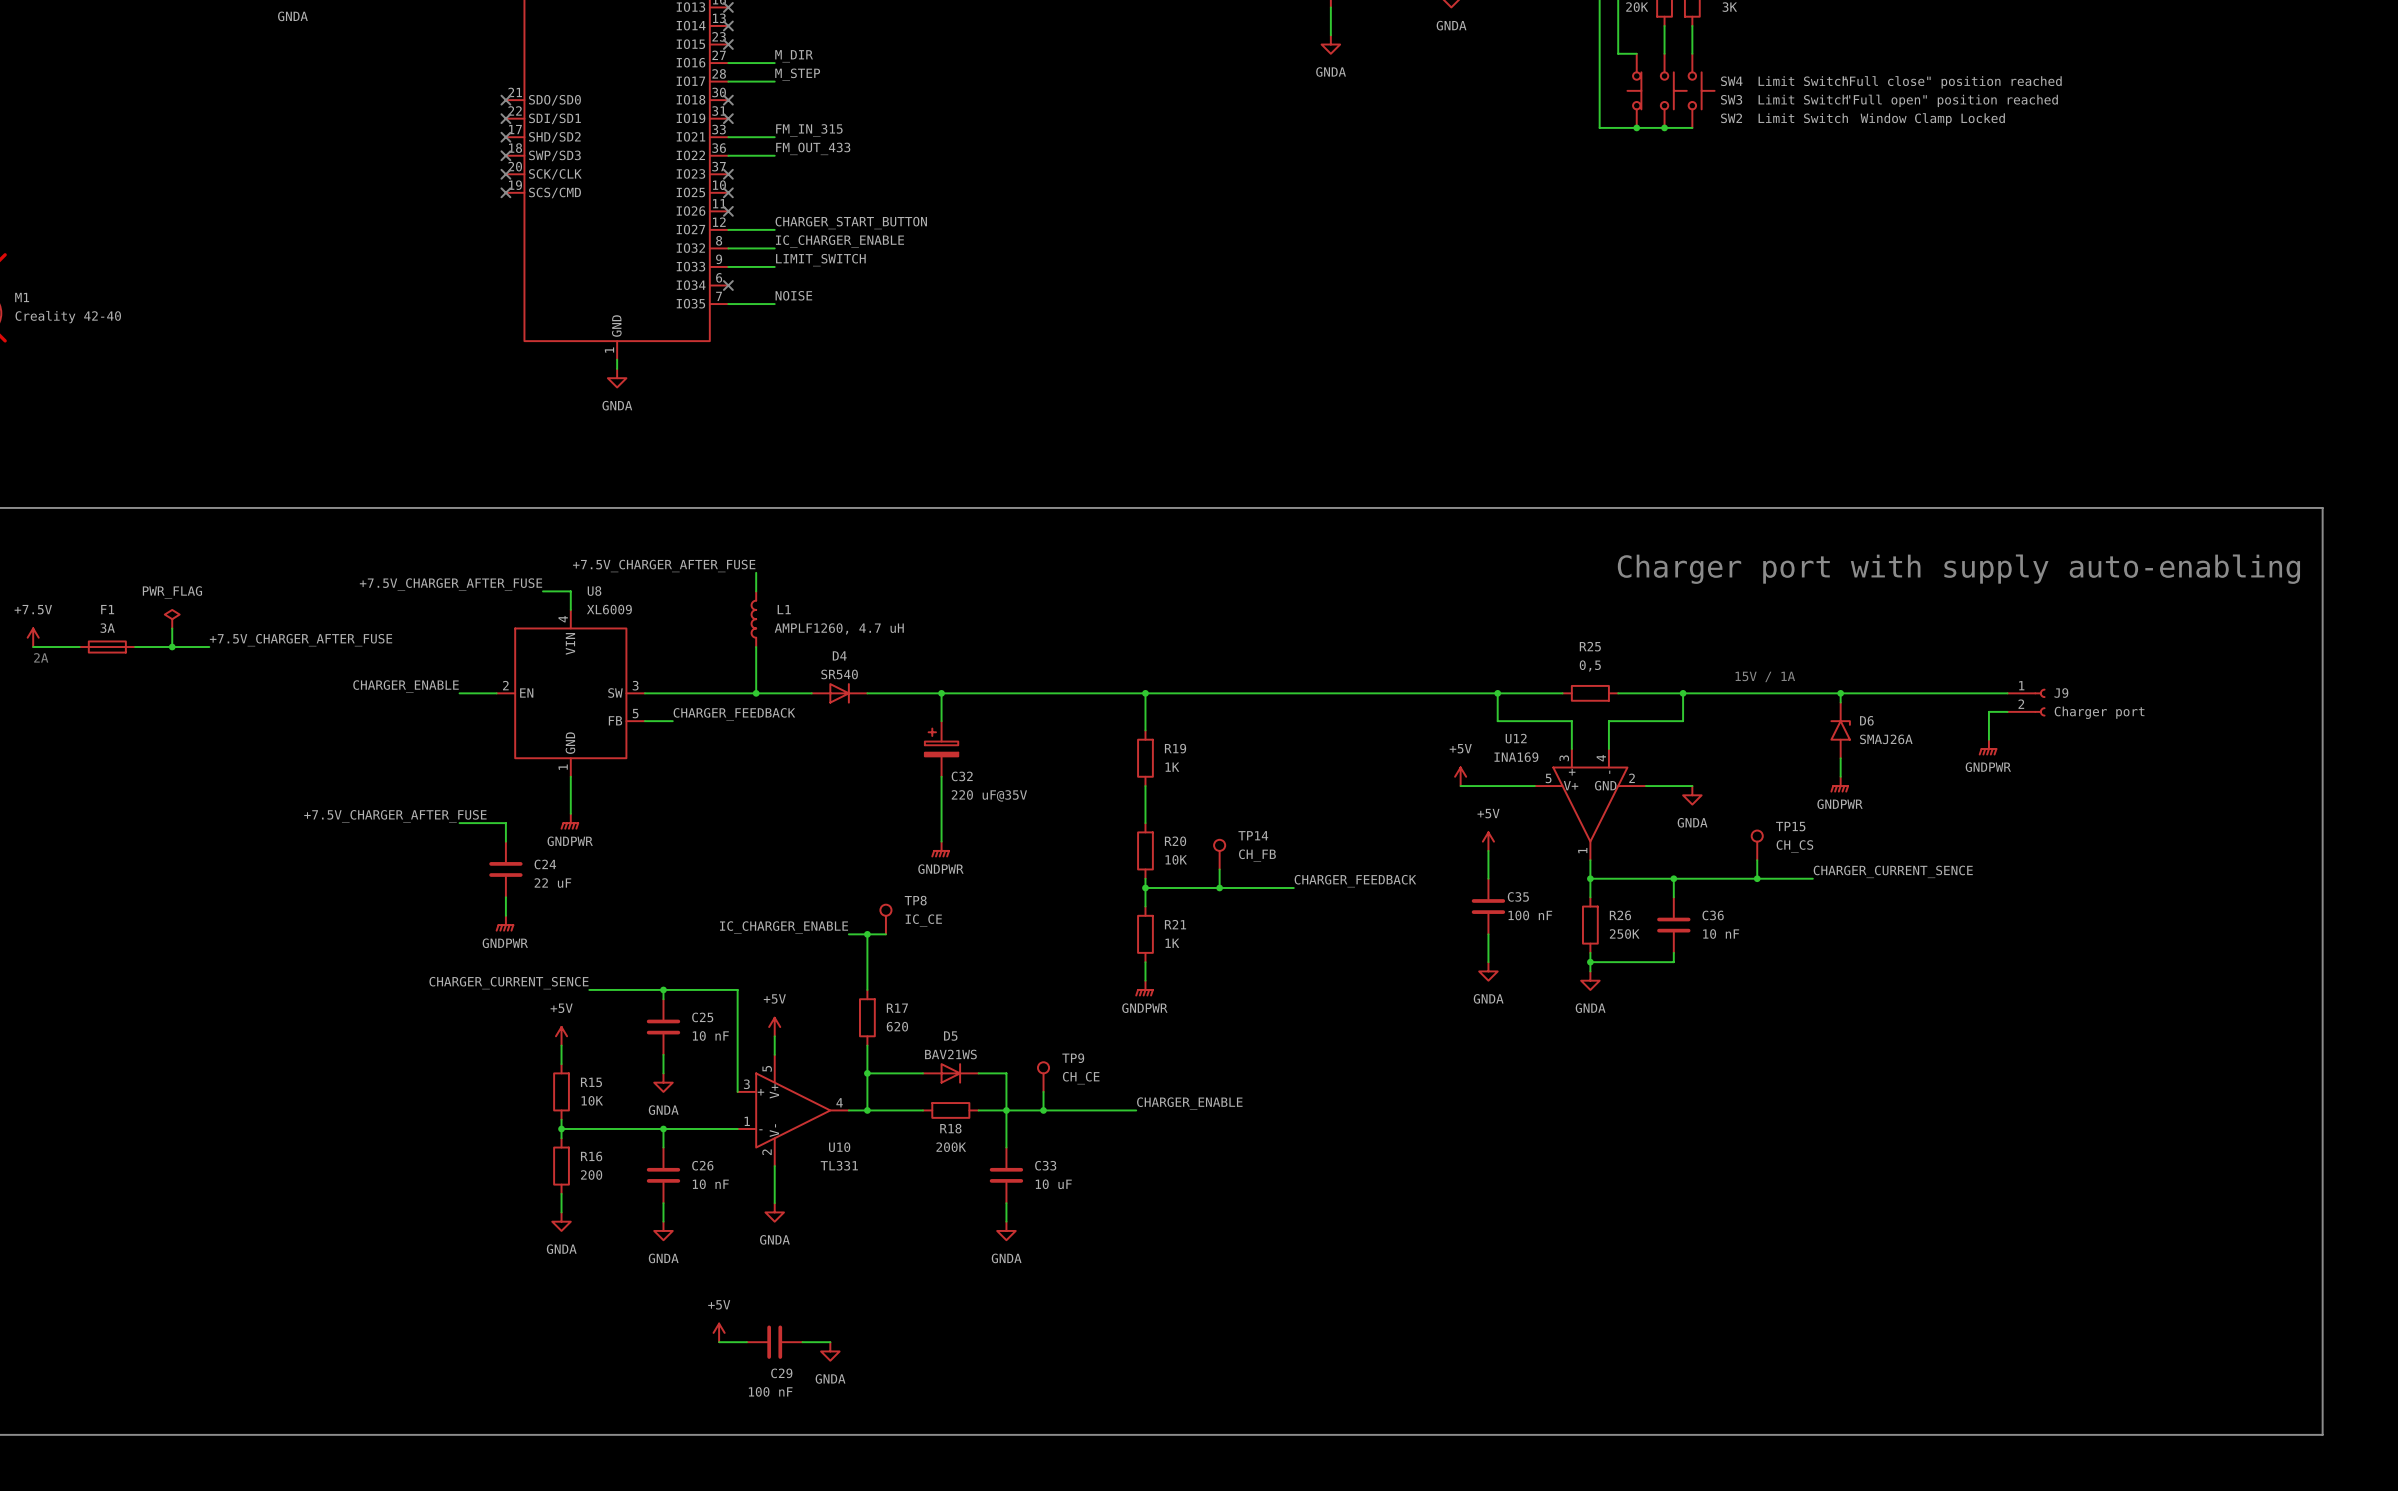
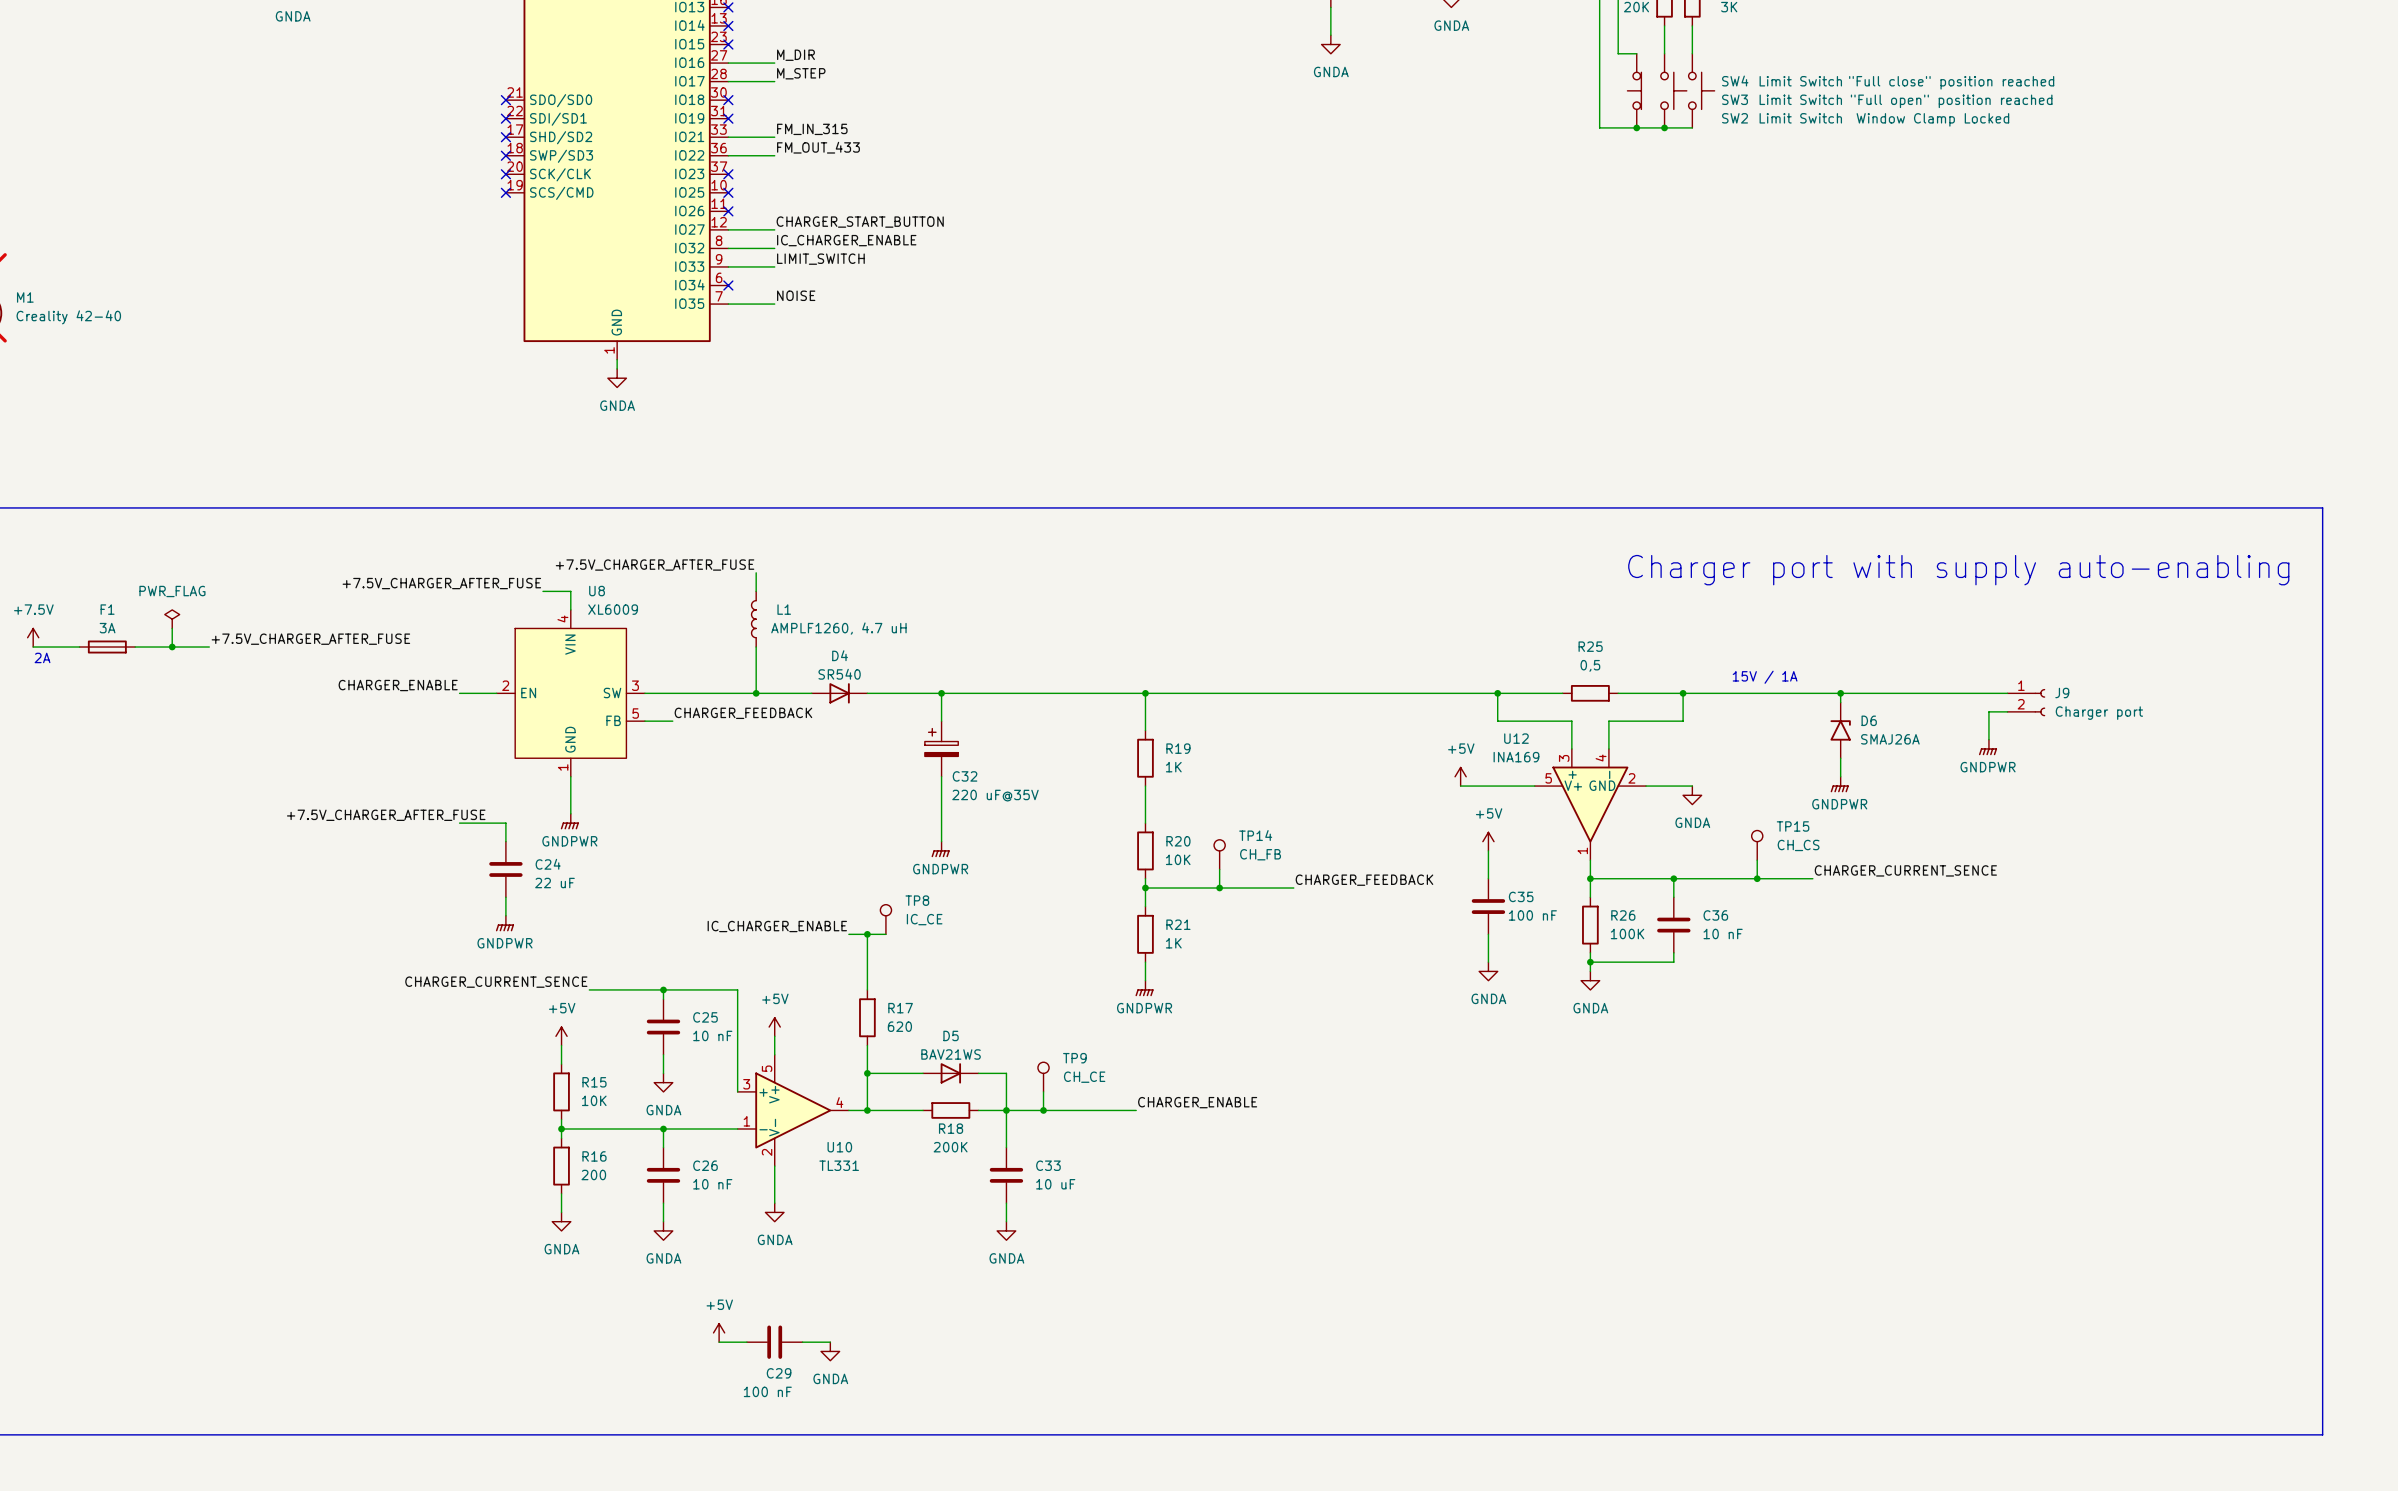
R26 value: 250K (1624, 934) -> 100K (1627, 934)

